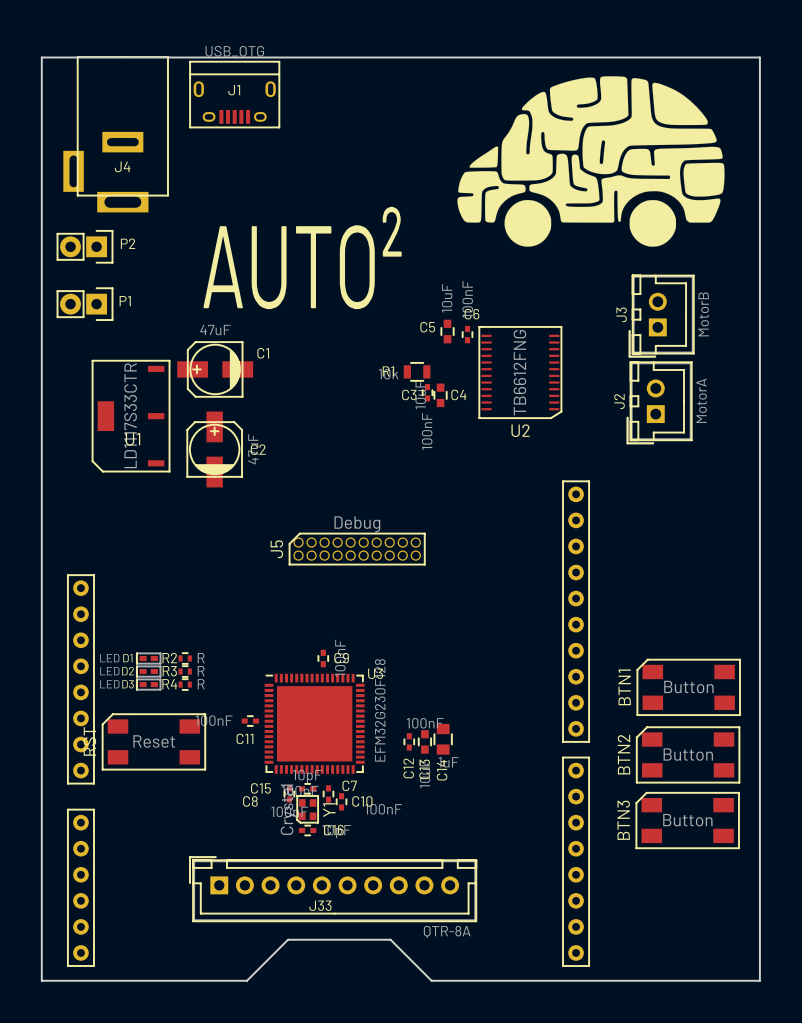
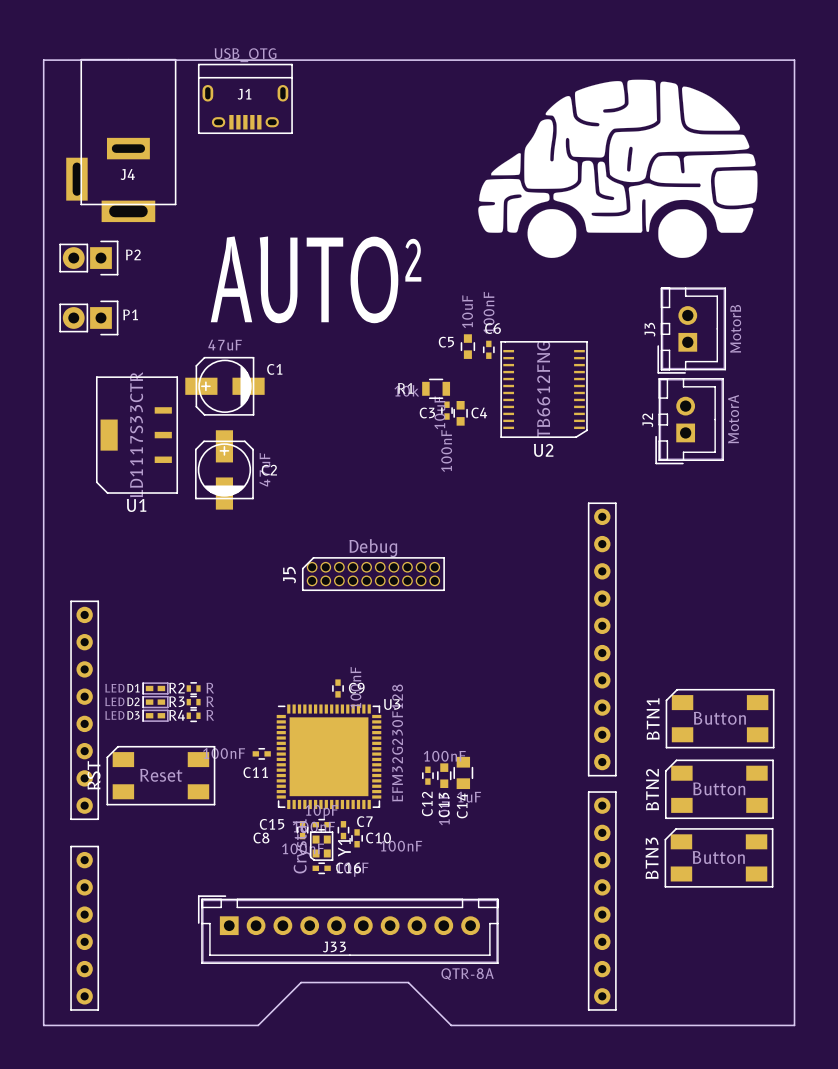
U1 footprint: [91, 359, 171, 473] -> [95, 376, 179, 494]
U1 name position: U1 (133, 439) -> U1 (136, 505)

